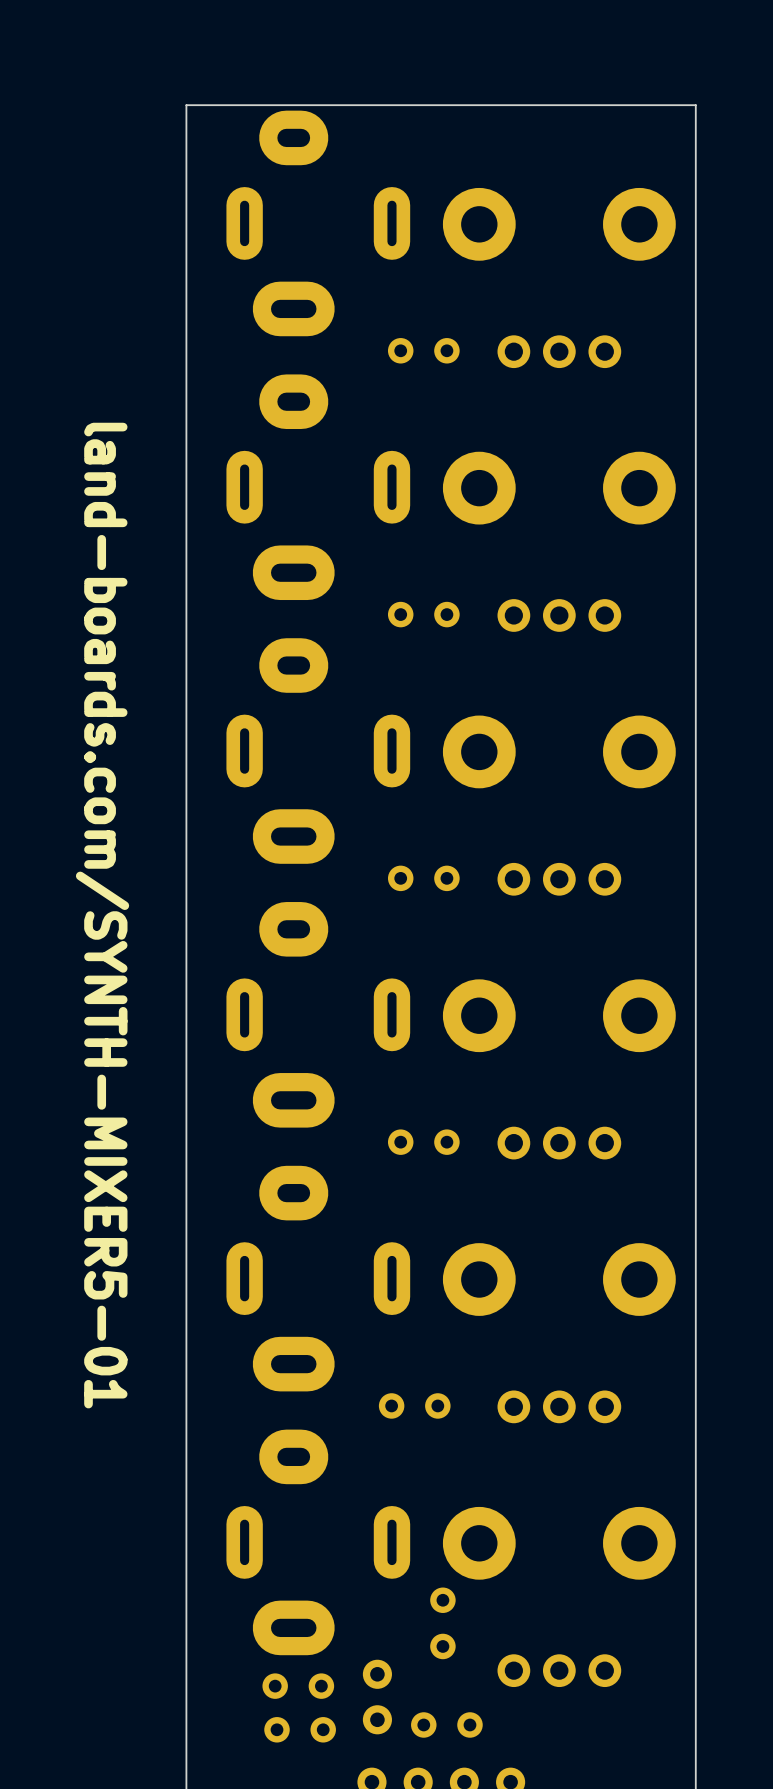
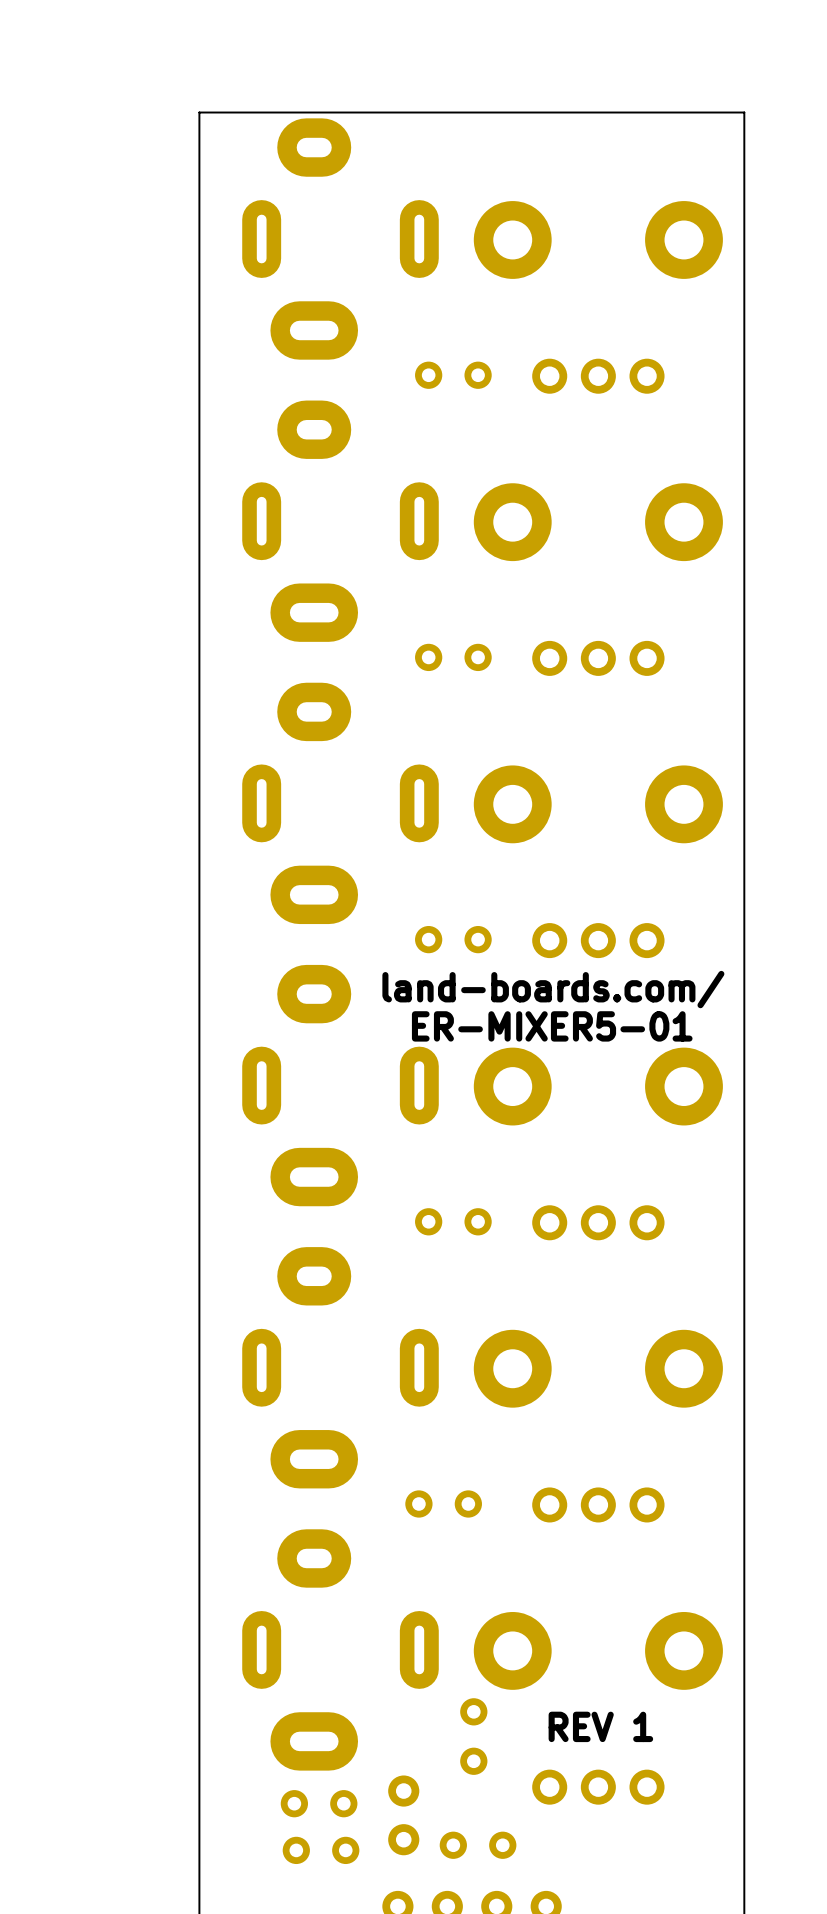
text: land-boards.com/SYNTH-MIXER5-01 (102, 915) -> none
text: none -> land-boards.com/ (553, 989)
text: none -> ER-MIXER5-01 (552, 1026)
text: none -> REV 1 (600, 1726)

